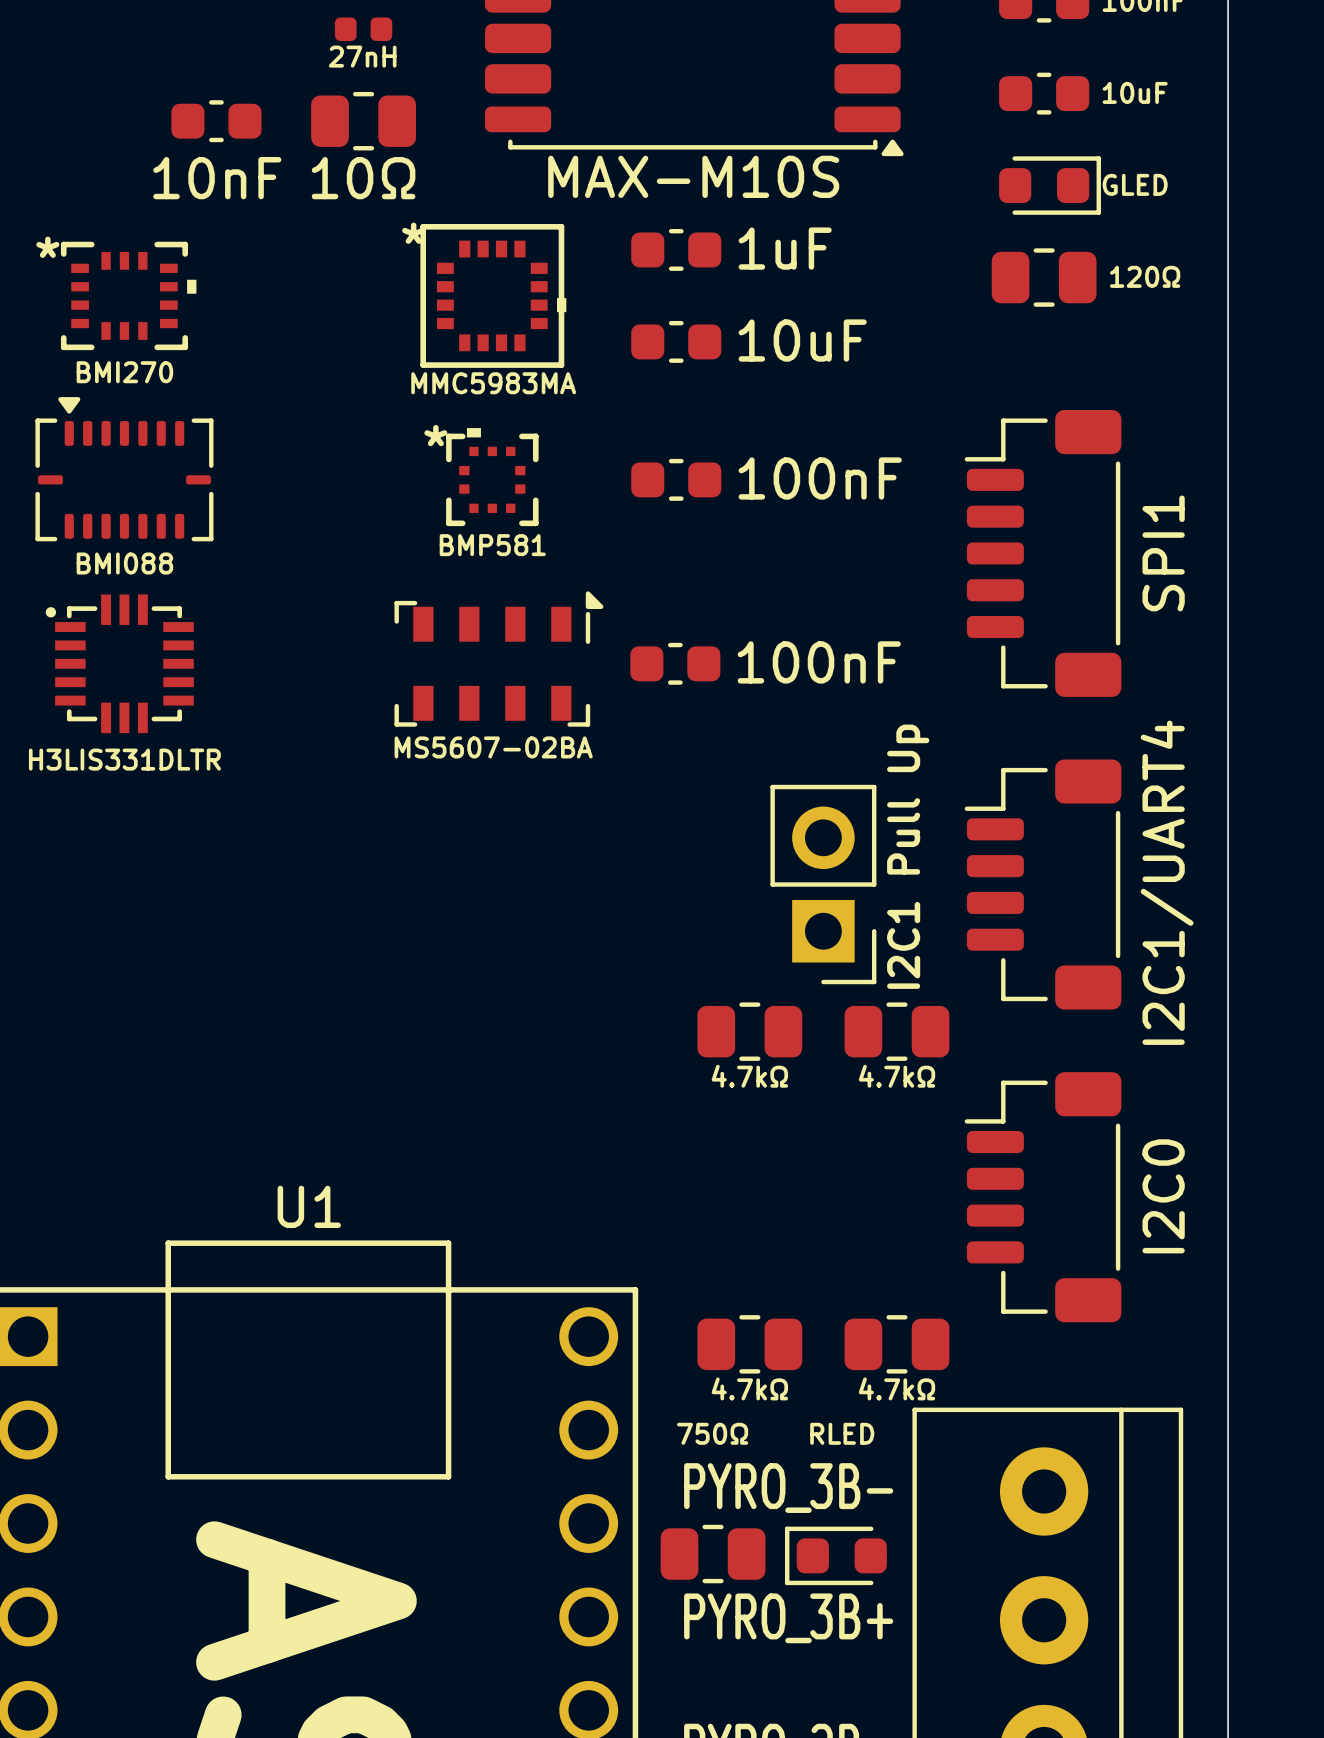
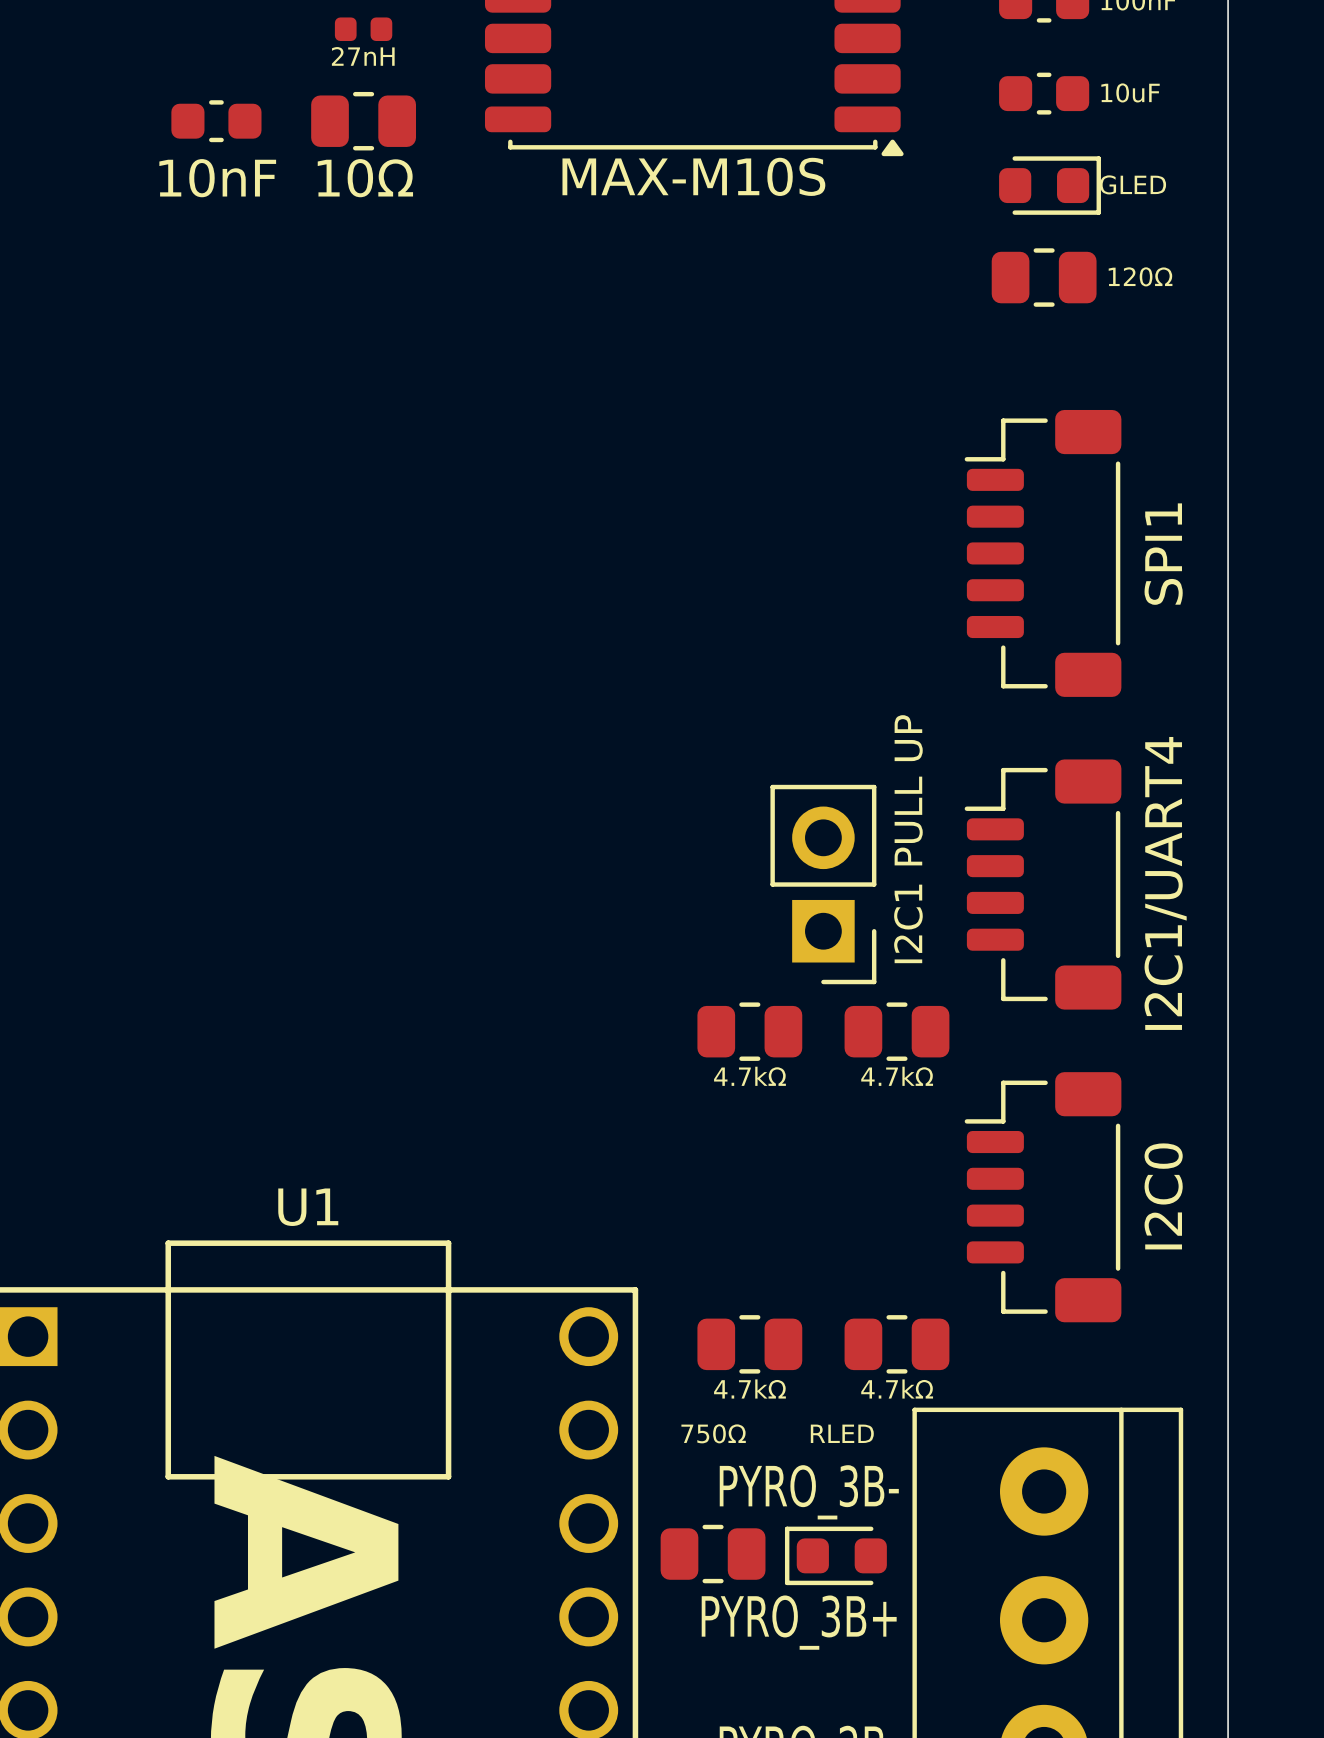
part: 1uF (676, 249) -> none
part: BMI270 (128, 295) -> none
part: MMC5983MA (493, 295) -> none
part: 10uF (676, 341) -> none
part: BMI088 (124, 469) -> none
part: BMP581 (492, 477) -> none
part: 100nF (676, 479) -> none
part: MS5607-02BA (498, 659) -> none
part: H3LIS331DLTR (119, 663) -> none
part: 100nF (675, 663) -> none
text: none -> I2C1 PULL UP (908, 839)
part value: I2C1 Pull Up (908, 856) -> none

